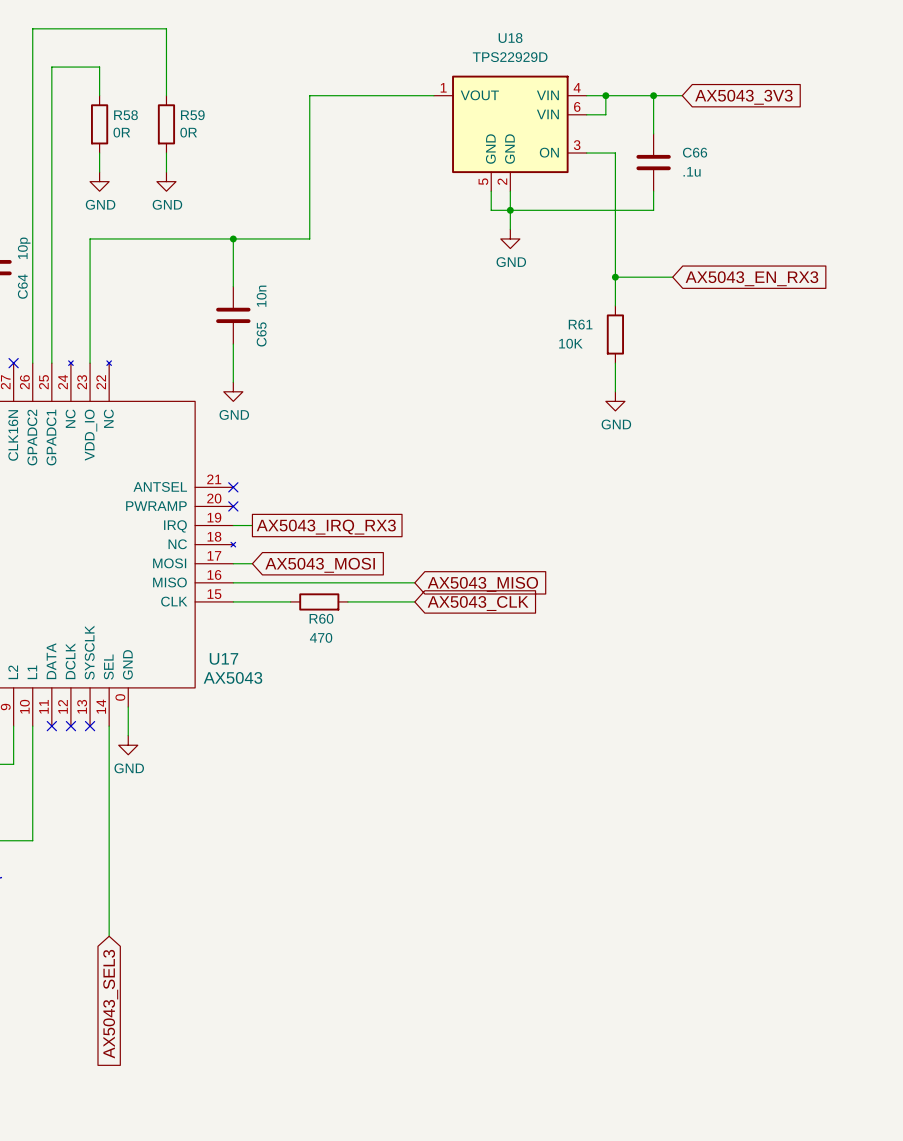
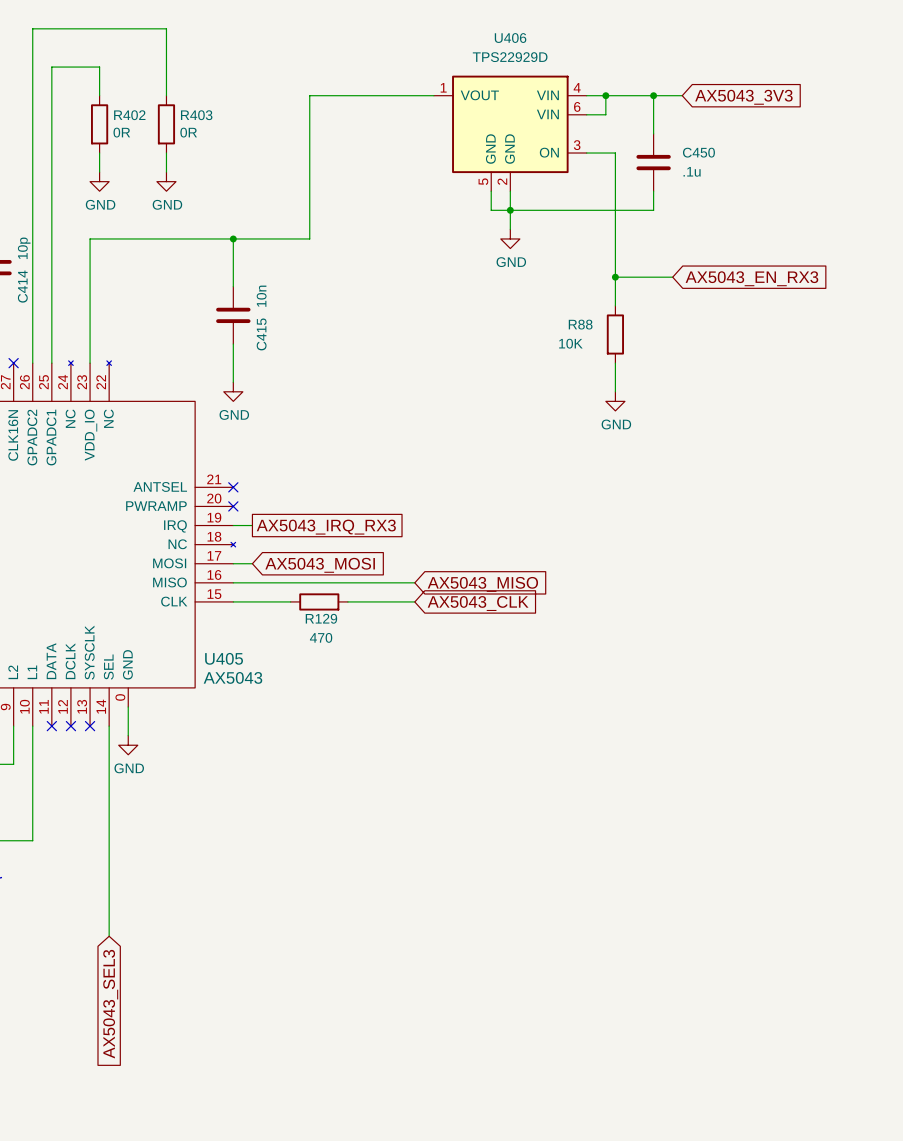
U18 name: U18 (510, 38) -> U406 (510, 38)
R58 name: R58 (125, 115) -> R402 (129, 115)
R59 name: R59 (192, 115) -> R403 (196, 115)
C66 name: C66 (695, 152) -> C450 (698, 152)
C64 name: C64 (22, 286) -> C414 (22, 286)
R61 name: R61 (580, 324) -> R88 (580, 324)
C65 name: C65 (261, 334) -> C415 (261, 334)
R60 name: R60 (321, 618) -> R129 (321, 618)
U17 name: U17 (224, 658) -> U405 (224, 658)

